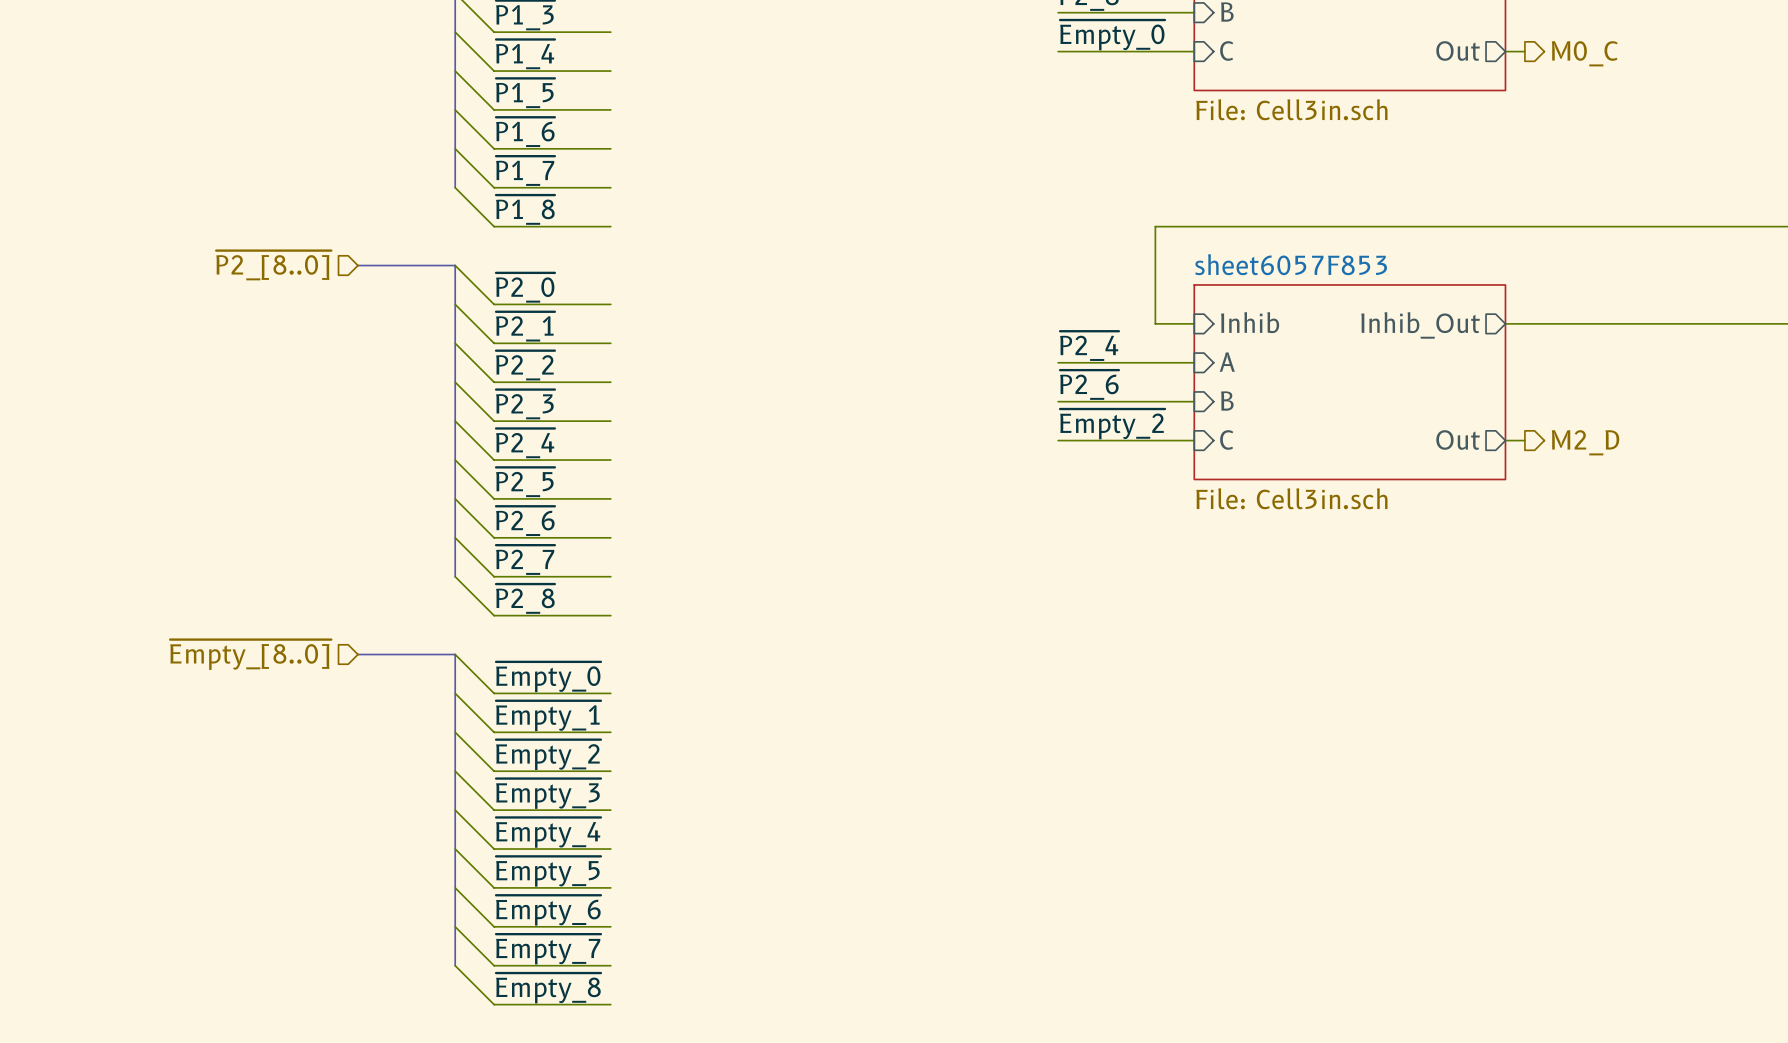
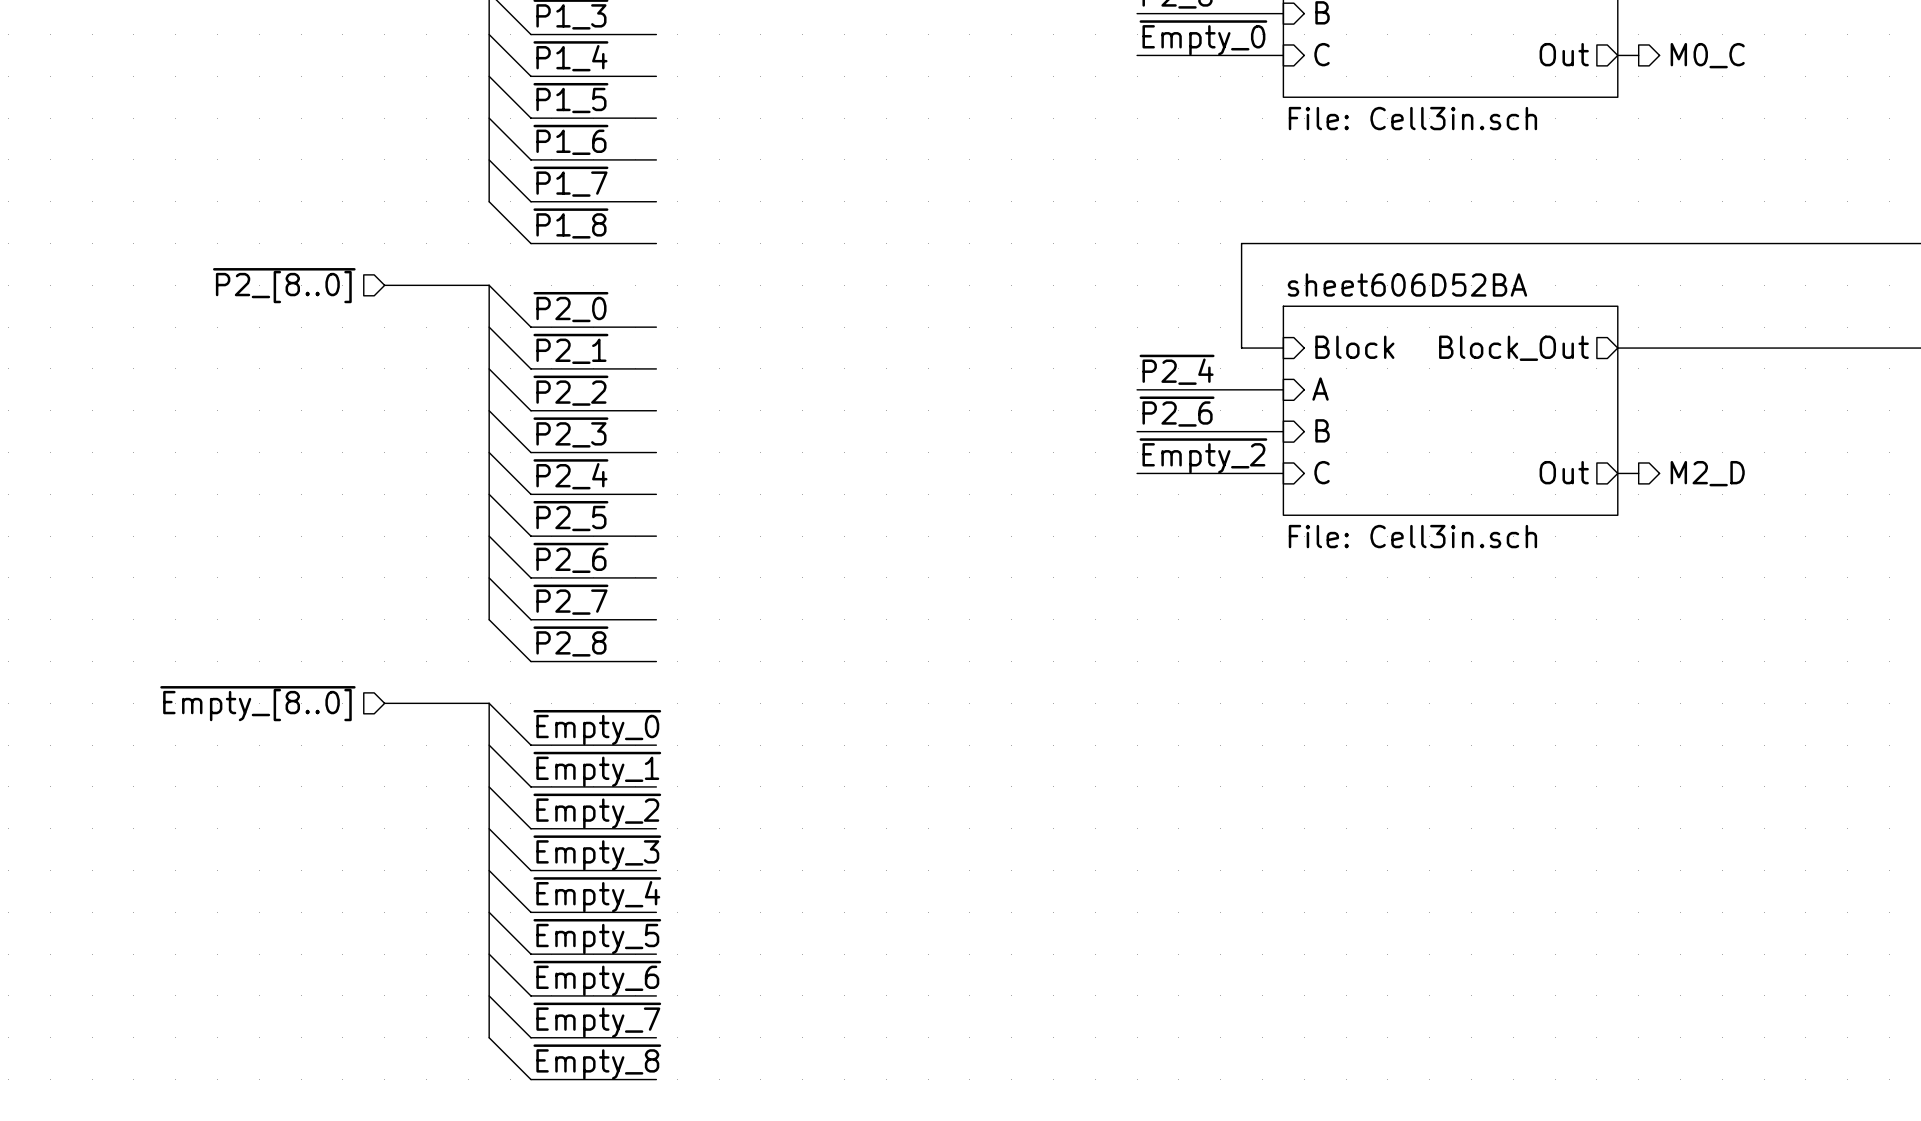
sheet sheet6057F853 name: sheet6057F853 (1291, 264) -> sheet606D52BA (1407, 285)
sheet pin: Inhib (1250, 322) -> Block (1354, 347)
sheet pin: Inhib_Out (1420, 325) -> Block_Out (1513, 348)

